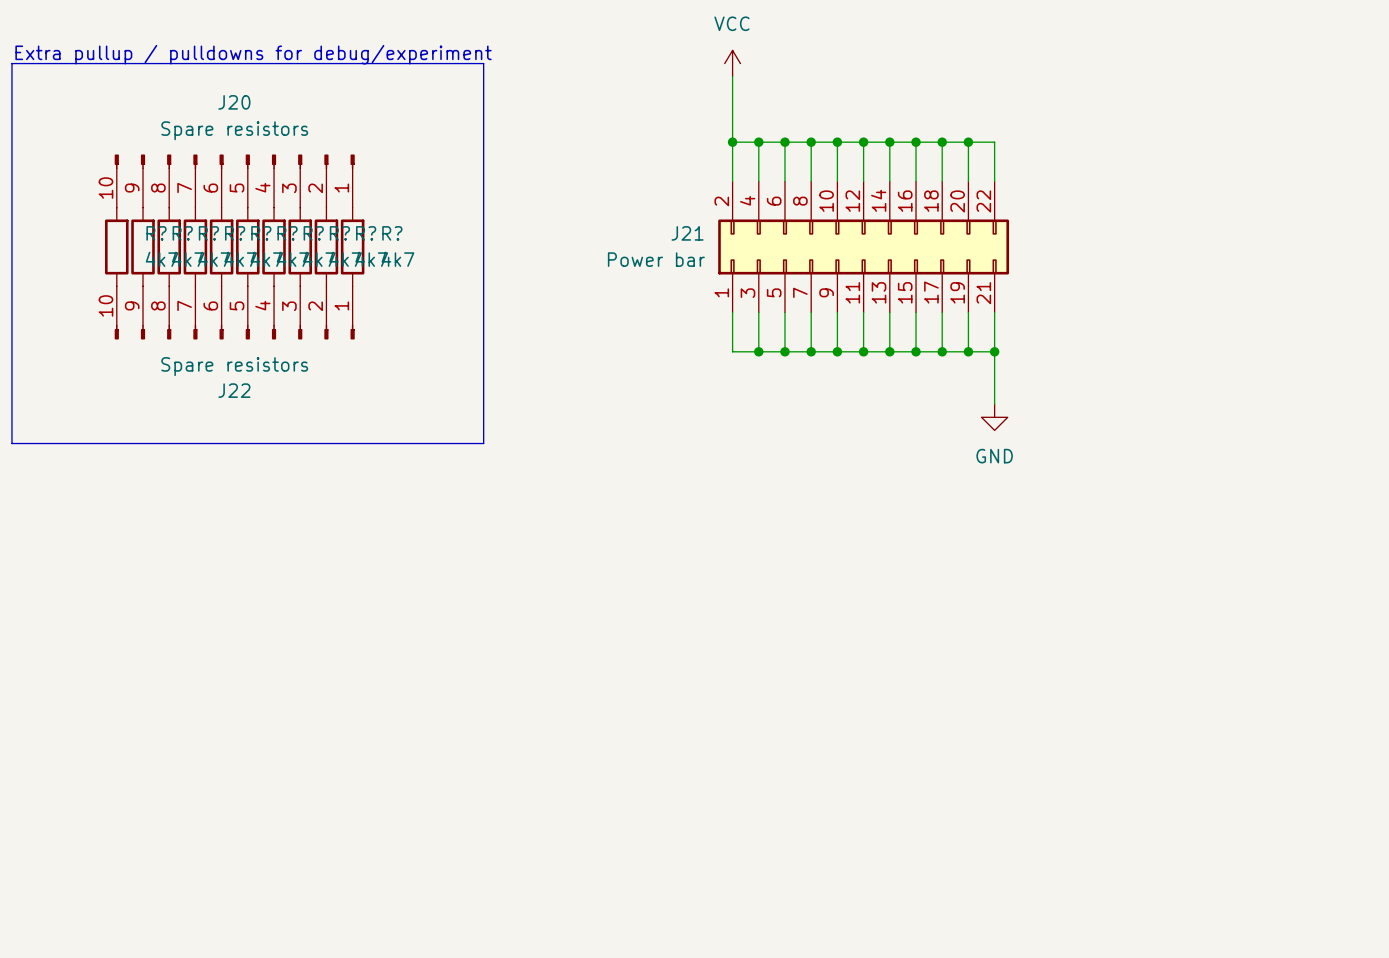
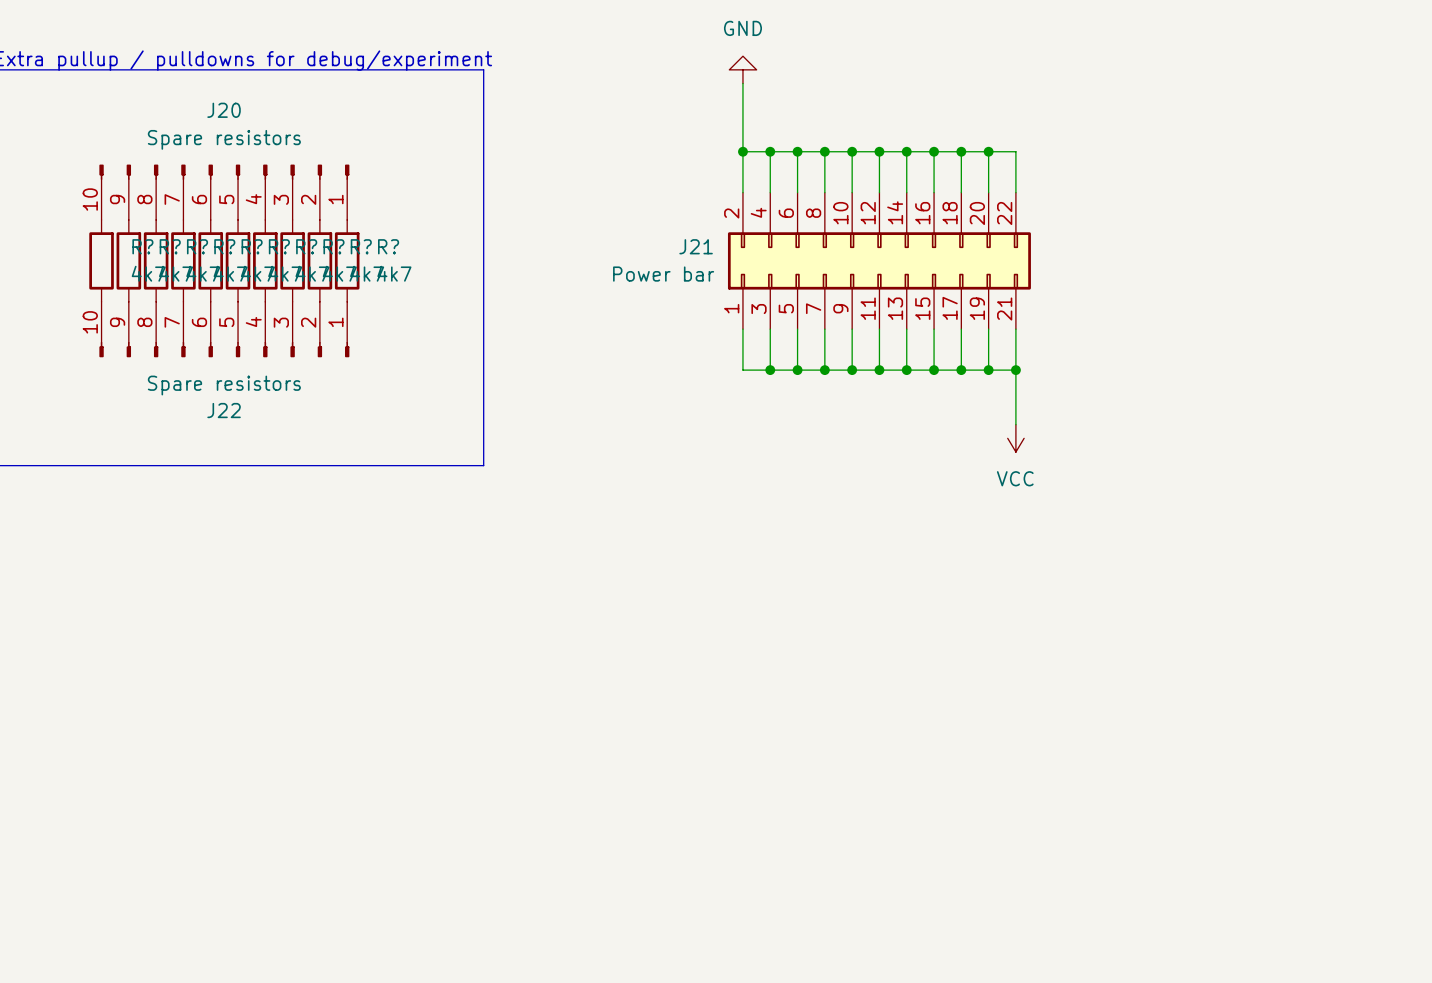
power symbol: VCC (732, 63) -> GND (742, 69)
power symbol: GND (994, 417) -> VCC (1015, 438)

